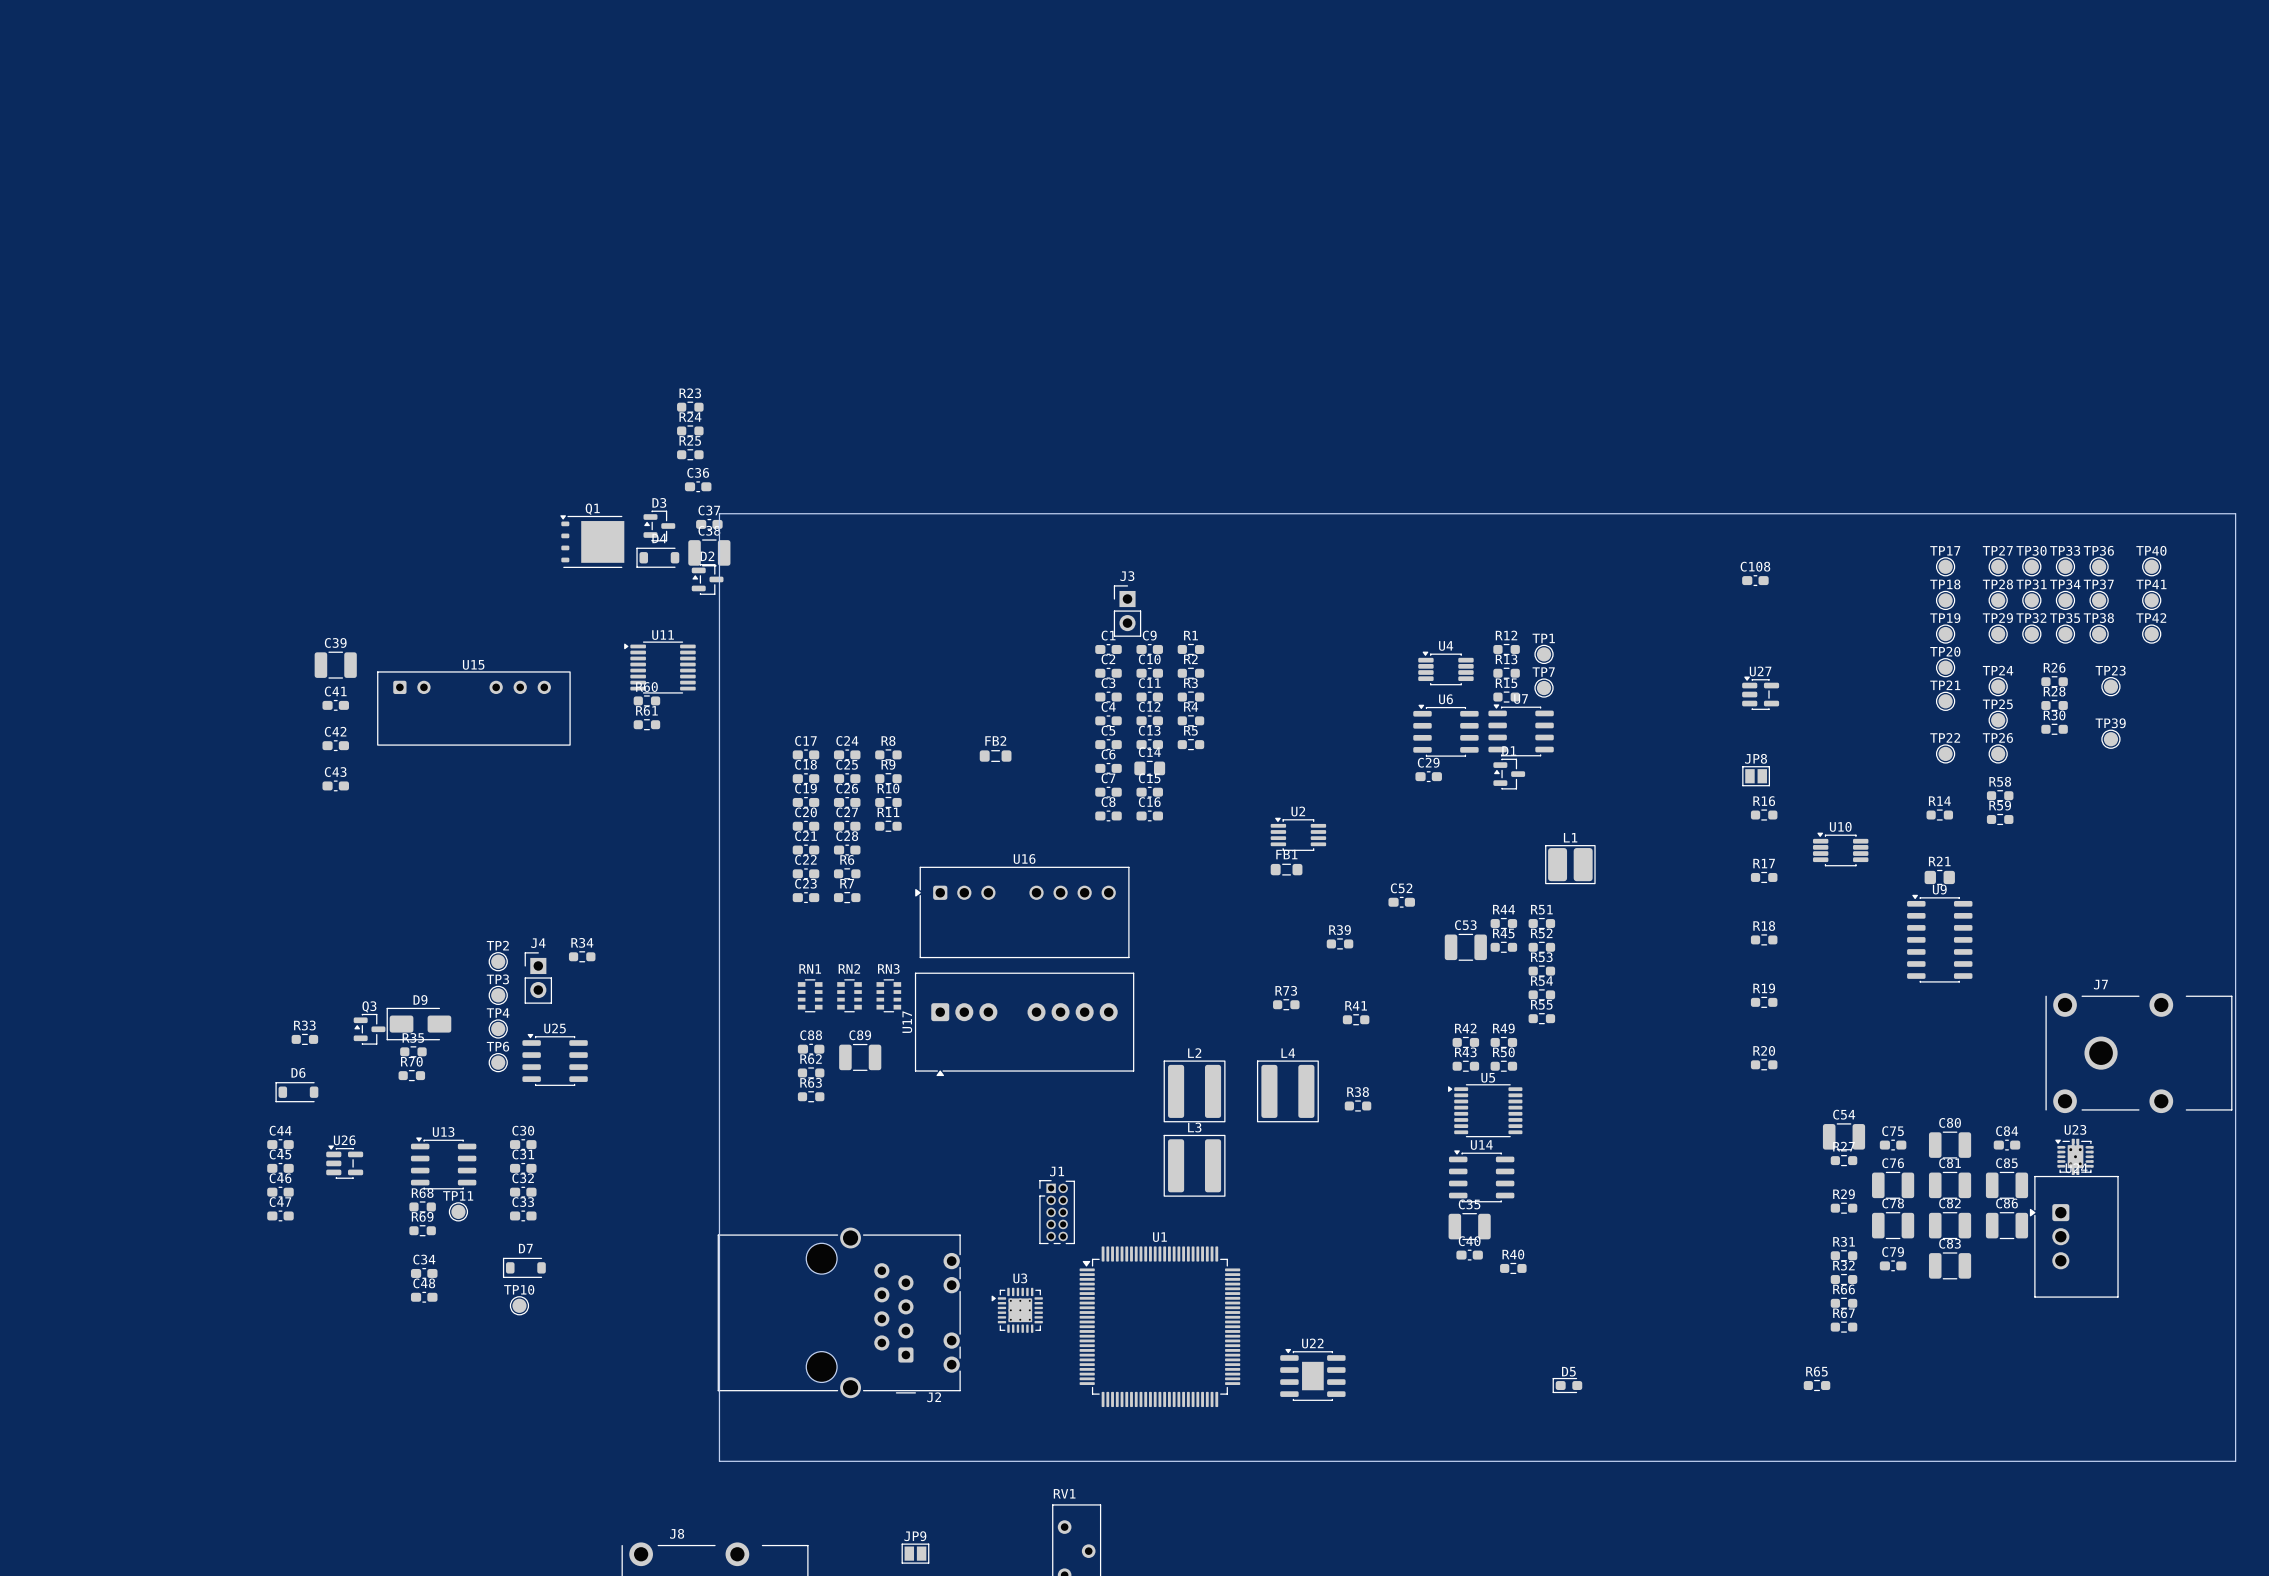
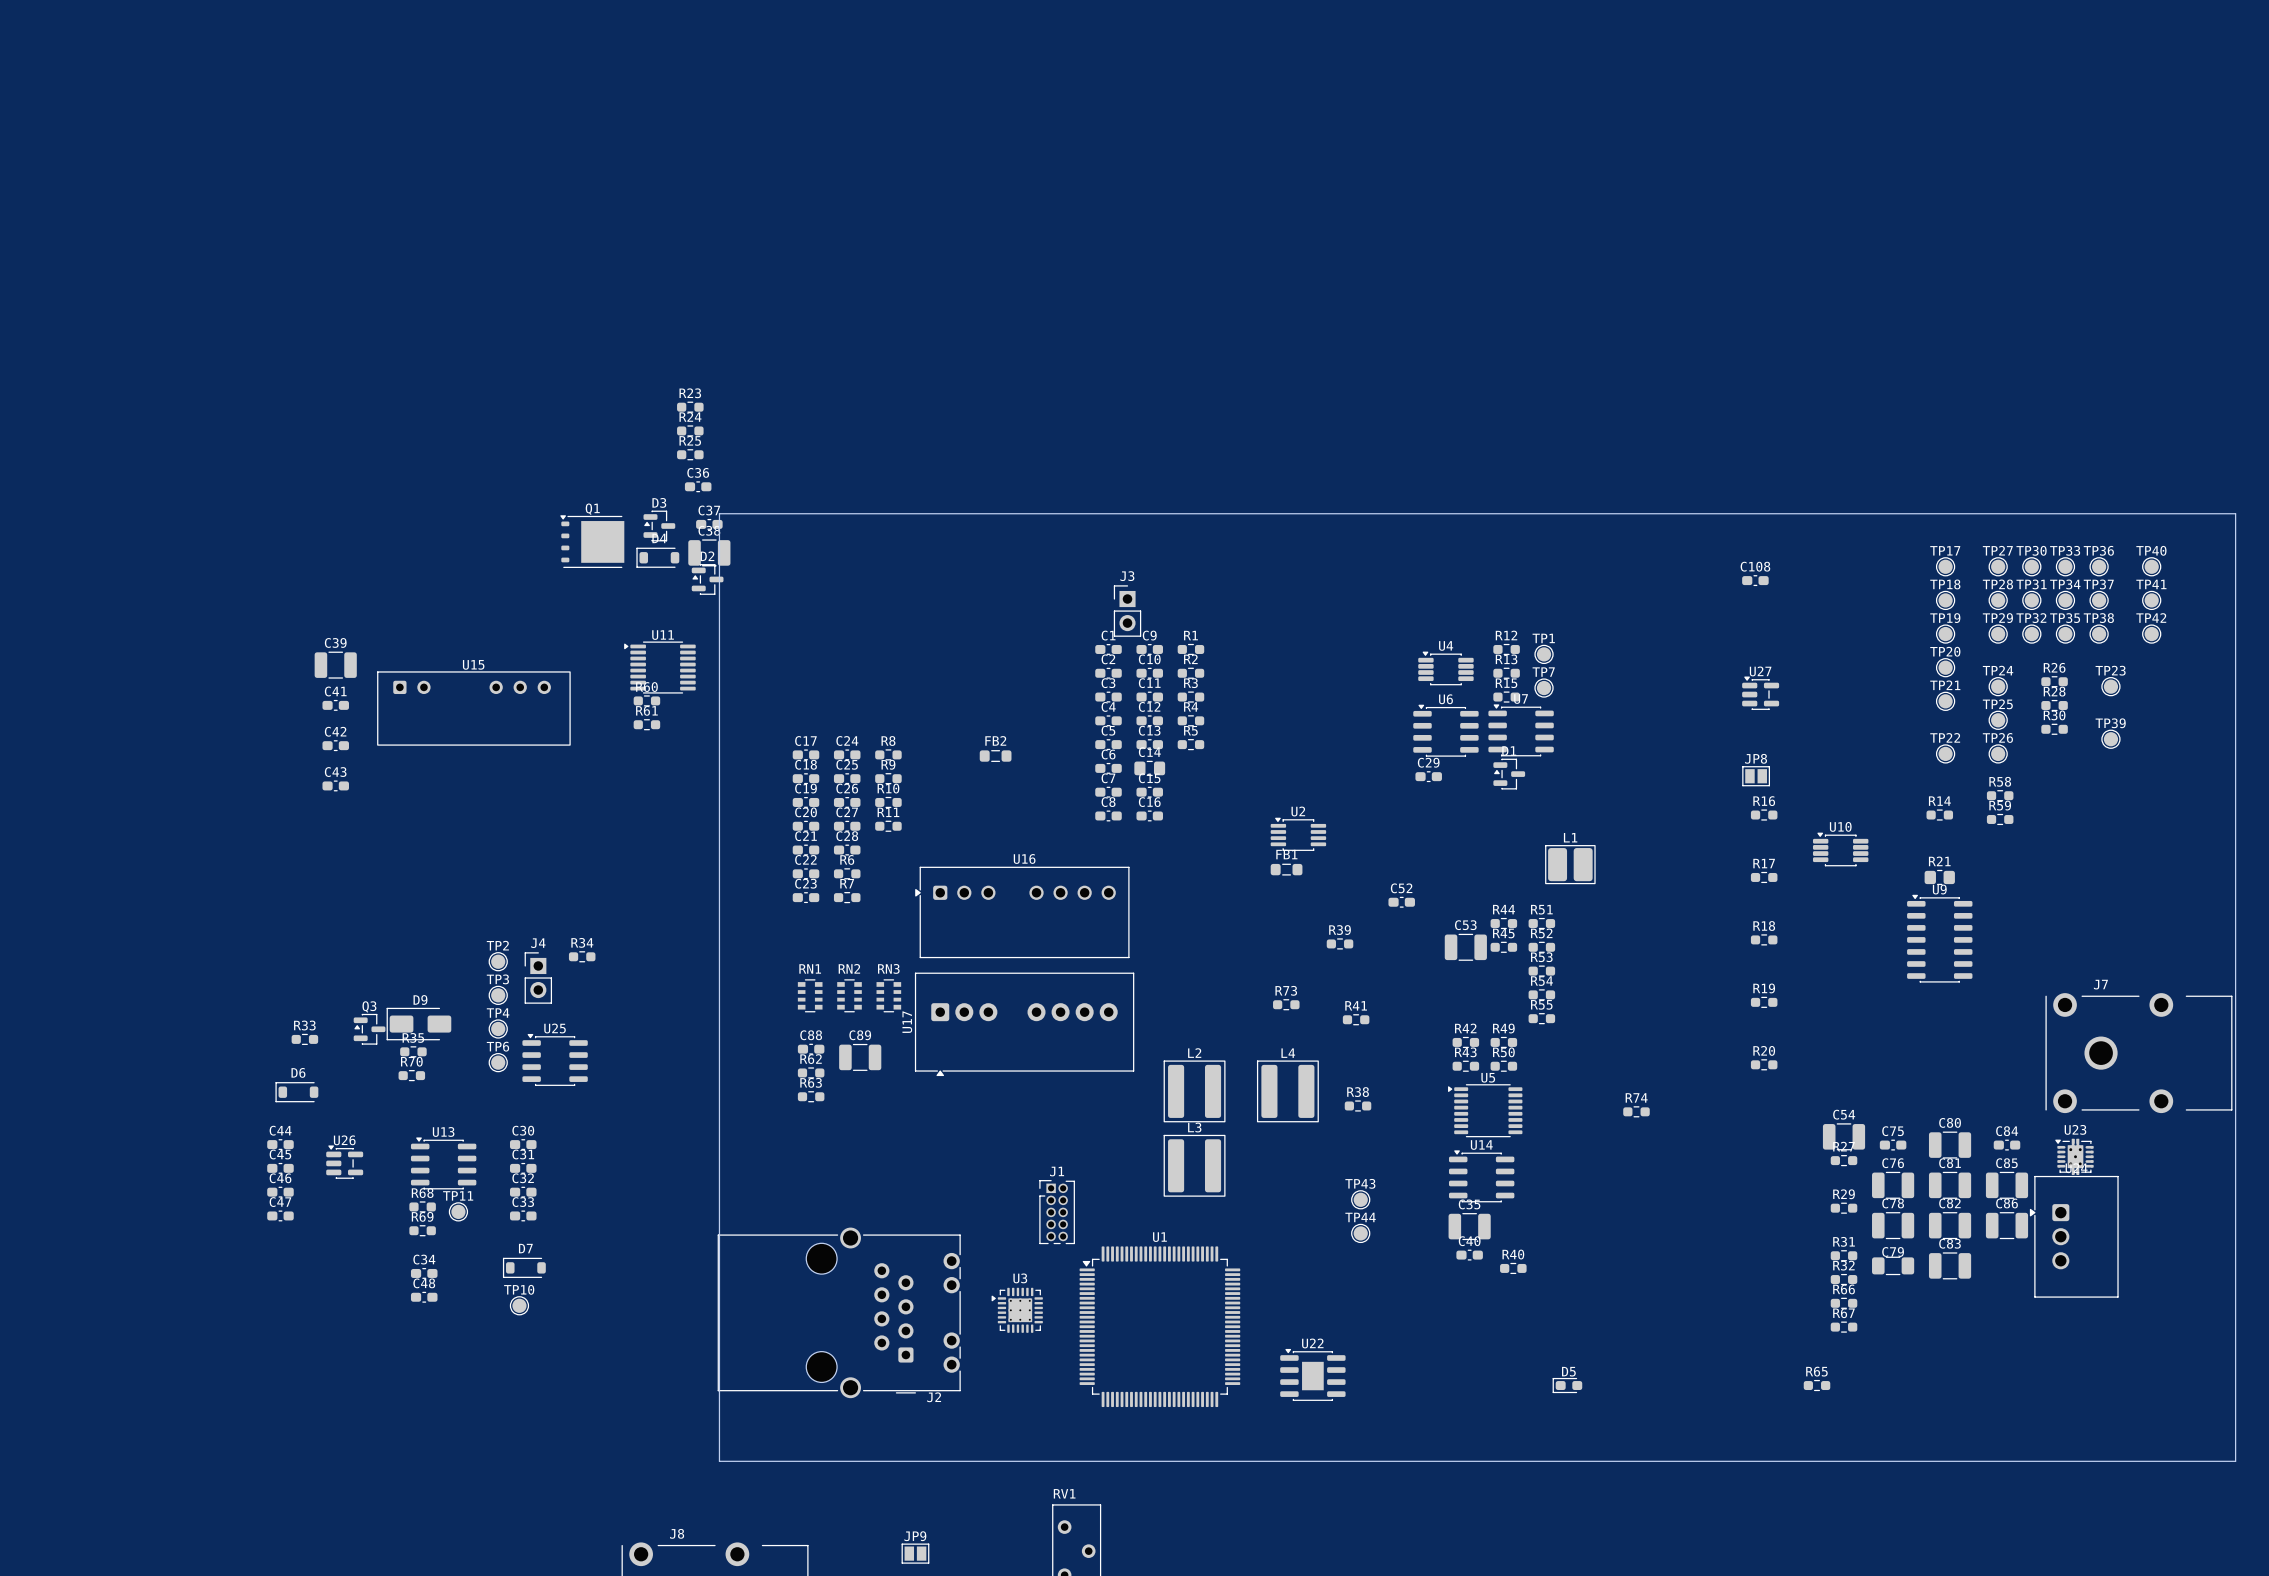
R74: none -> (1636, 1111)
TP43: none -> (1360, 1199)
TP44: none -> (1360, 1233)
C79 footprint: [1879, 1260, 1907, 1272] -> [1872, 1256, 1915, 1276]

